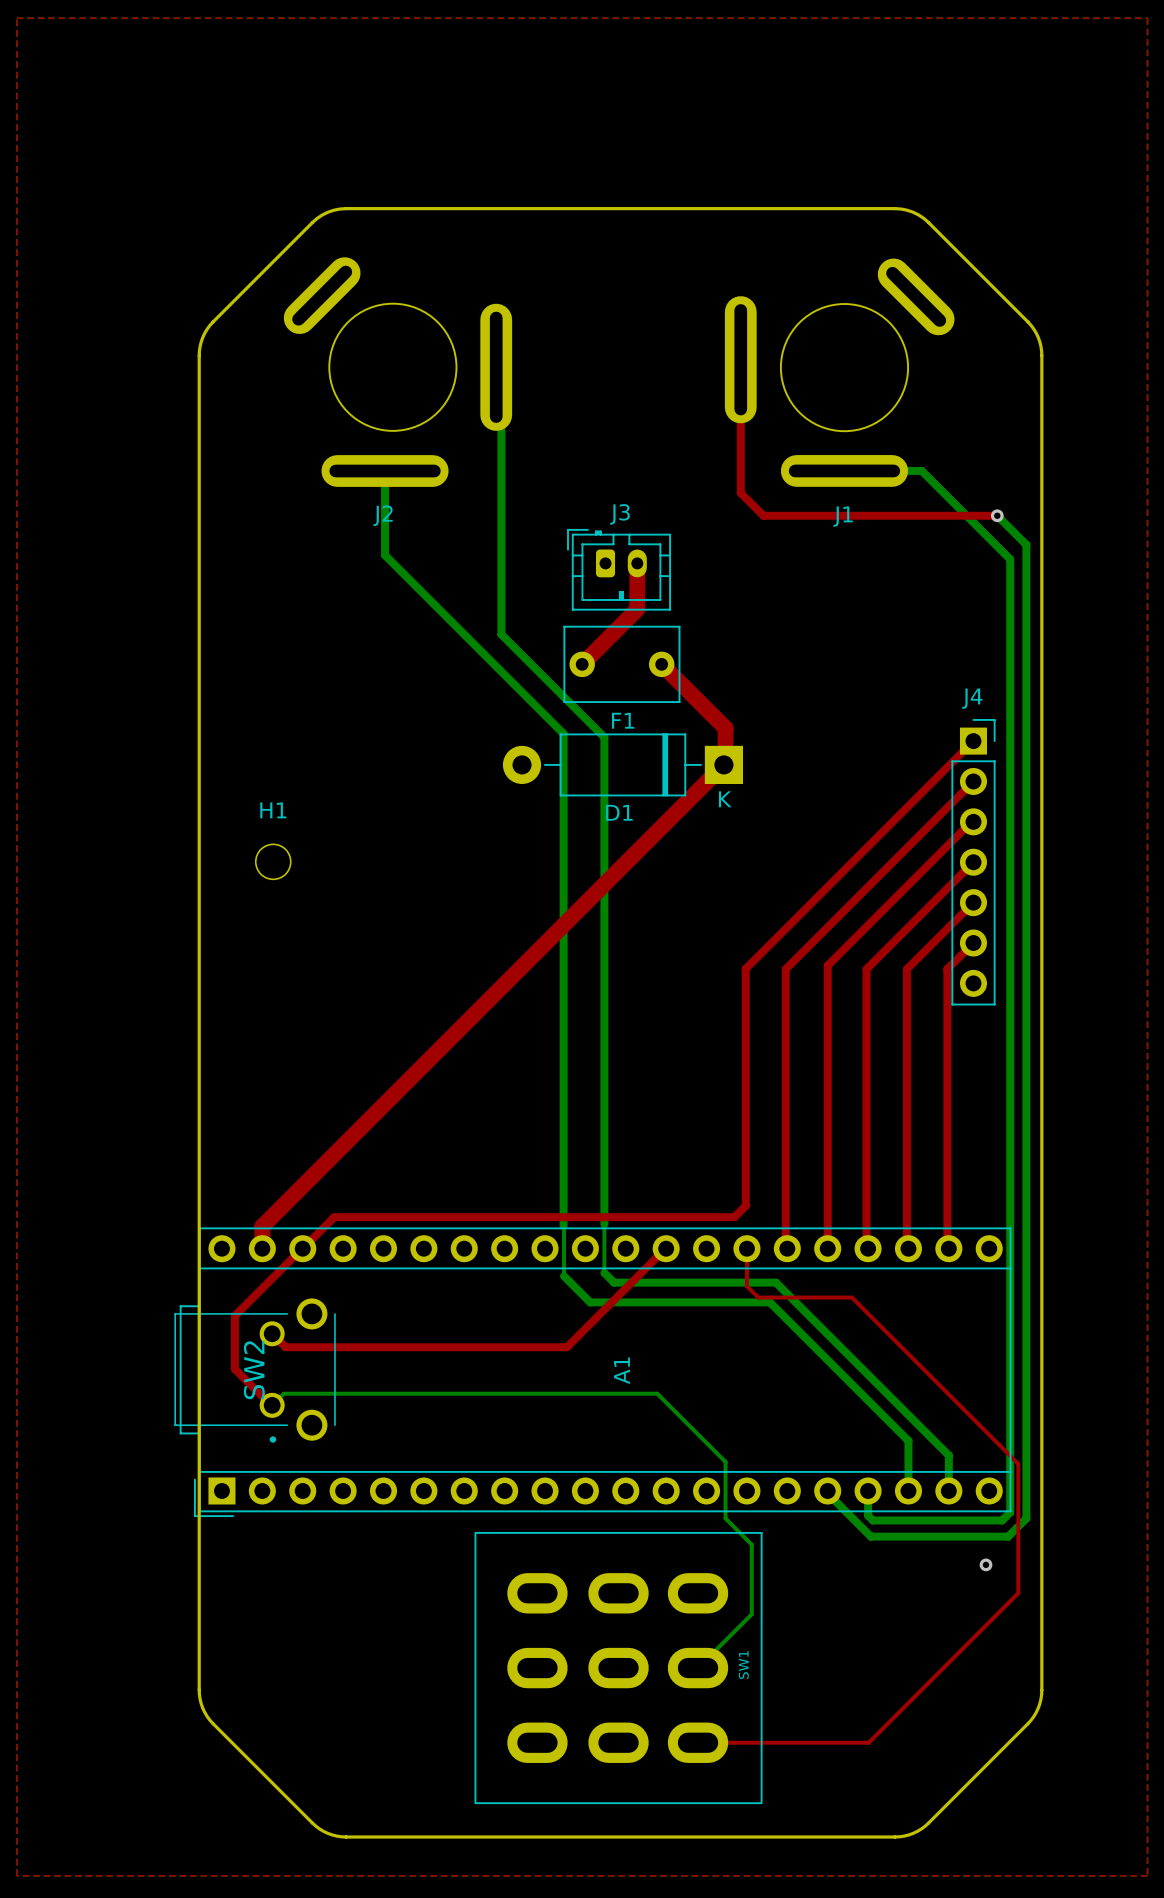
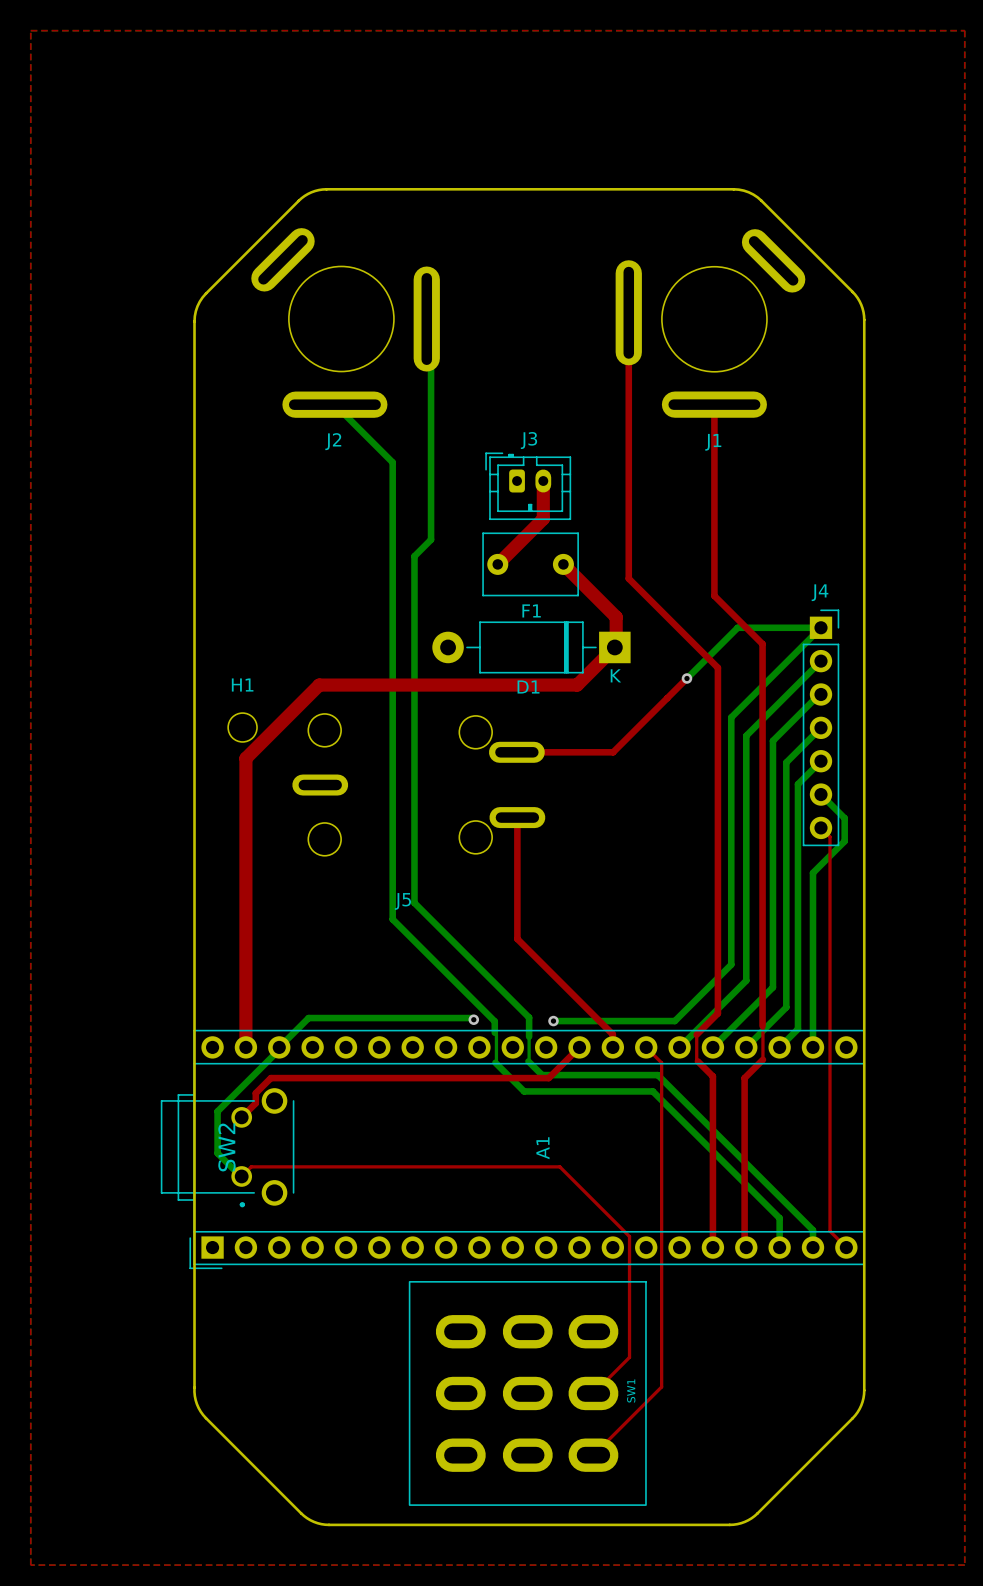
board edge: (346, 208) (901, 209) (913, 212) (928, 222) (1027, 321) (1039, 341) (1041, 355) (1041, 1694) (1038, 1708) (1027, 1723) (928, 1823) (908, 1834) (894, 1837) (336, 1836) (323, 1831) (312, 1823) (213, 1723) (201, 1703) (199, 1690) (199, 350) (202, 337) (210, 325) (312, 222) (327, 212) (346, 208) -> (326, 189) (311, 192) (298, 200) (206, 293) (199, 301) (194, 316) (195, 1400) (205, 1418) (301, 1513) (310, 1520) (321, 1524) (729, 1524) (741, 1523) (757, 1513) (852, 1418) (859, 1408) (864, 1394) (864, 319) (862, 308) (852, 292) (761, 200) (743, 190) (326, 189)
top track: none -> (714, 404) (714, 595) (762, 644) (762, 1026)
bottom track: (844, 470) (921, 470) (1010, 559) (1010, 1512) (1002, 1520) (872, 1520) (868, 1515) (868, 1490) -> none
bottom track: (385, 471) (385, 555) (563, 733) (564, 1276) (590, 1302) (614, 1302) -> (334, 404) (392, 462) (392, 919) (494, 1021) (495, 1062) (524, 1091)
top track: (740, 493) (763, 515) (997, 515) -> (628, 422) (628, 578) (717, 667) (717, 1013) (696, 1034)
bottom track: (997, 515) (1026, 544) (1026, 1518) (1008, 1536) (870, 1536) (827, 1493) (827, 1490) -> none
via: (997, 515) -> none
bottom track: (501, 634) (604, 737) (604, 1272) (614, 1282) (635, 1282) -> (431, 539) (414, 556) (414, 902) (529, 1017) (528, 1061) (542, 1075)
top track: (973, 741) (745, 968) (745, 1205) (734, 1217) (334, 1217) (234, 1315) (234, 1369) (272, 1405) -> (593, 1393) (629, 1357) (629, 1236) (559, 1166) (251, 1166) (241, 1176)
top track: (973, 781) (785, 969) (785, 1247) (787, 1248) -> none
bottom track: none -> (820, 661) (746, 735) (746, 980) (679, 1047)
top track: none -> (686, 678) (613, 752) (516, 752)
bottom track: none -> (686, 678) (737, 627) (820, 627) (731, 717) (731, 964) (674, 1021) (553, 1021)
via: none -> (686, 678)
top track: (678, 810) (262, 1226) (262, 1248) -> (577, 685) (319, 685) (245, 758) (245, 1047)
top track: (973, 821) (827, 965) (827, 1248) -> none
bottom track: none -> (820, 694) (772, 740) (772, 987) (712, 1047)
top track: (973, 862) (866, 969) (866, 1247) (868, 1248) -> none
bottom track: none -> (820, 727) (786, 762) (786, 1007) (746, 1047)
top track: (973, 902) (906, 969) (906, 1247) (908, 1248) -> none
bottom track: none -> (820, 761) (797, 784) (797, 1029) (779, 1047)
J5: none -> (418, 784)
top track: (973, 943) (947, 969) (947, 1247) (948, 1248) -> none
bottom track: none -> (820, 794) (844, 818) (844, 841) (812, 872) (812, 1047)
top track: none -> (517, 817) (517, 939) (612, 1034) (612, 1047)
top track: none -> (820, 827) (830, 836) (830, 1231) (846, 1247)
via: none -> (473, 1019)
via: none -> (553, 1021)
top track: none -> (762, 1026) (762, 1059) (744, 1078) (744, 1245) (746, 1247)
top track: none -> (696, 1034) (696, 1060) (712, 1076) (712, 1247)
top track: (666, 1248) (566, 1347) (285, 1347) (272, 1333) -> (579, 1047) (548, 1078) (270, 1078) (255, 1093) (255, 1103) (241, 1117)
top track: (746, 1248) (746, 1286) (758, 1297) (851, 1297) (1018, 1463) (1018, 1593) (868, 1742) (698, 1742) -> (646, 1047) (661, 1062) (661, 1386) (593, 1455)
A1 position: (595, 1372) -> (521, 1149)
bottom track: (272, 1405) (283, 1393) (657, 1393) (725, 1461) (725, 1518) (751, 1544) (751, 1614) (698, 1668) -> (241, 1176) (217, 1153) (217, 1111) (308, 1018) (472, 1018) (473, 1019)
bottom track: (908, 1440) (908, 1490) -> (767, 1205) (779, 1218) (779, 1247)
bottom track: (948, 1455) (948, 1490) -> (800, 1217) (812, 1230) (812, 1247)
via: (986, 1564) -> none

